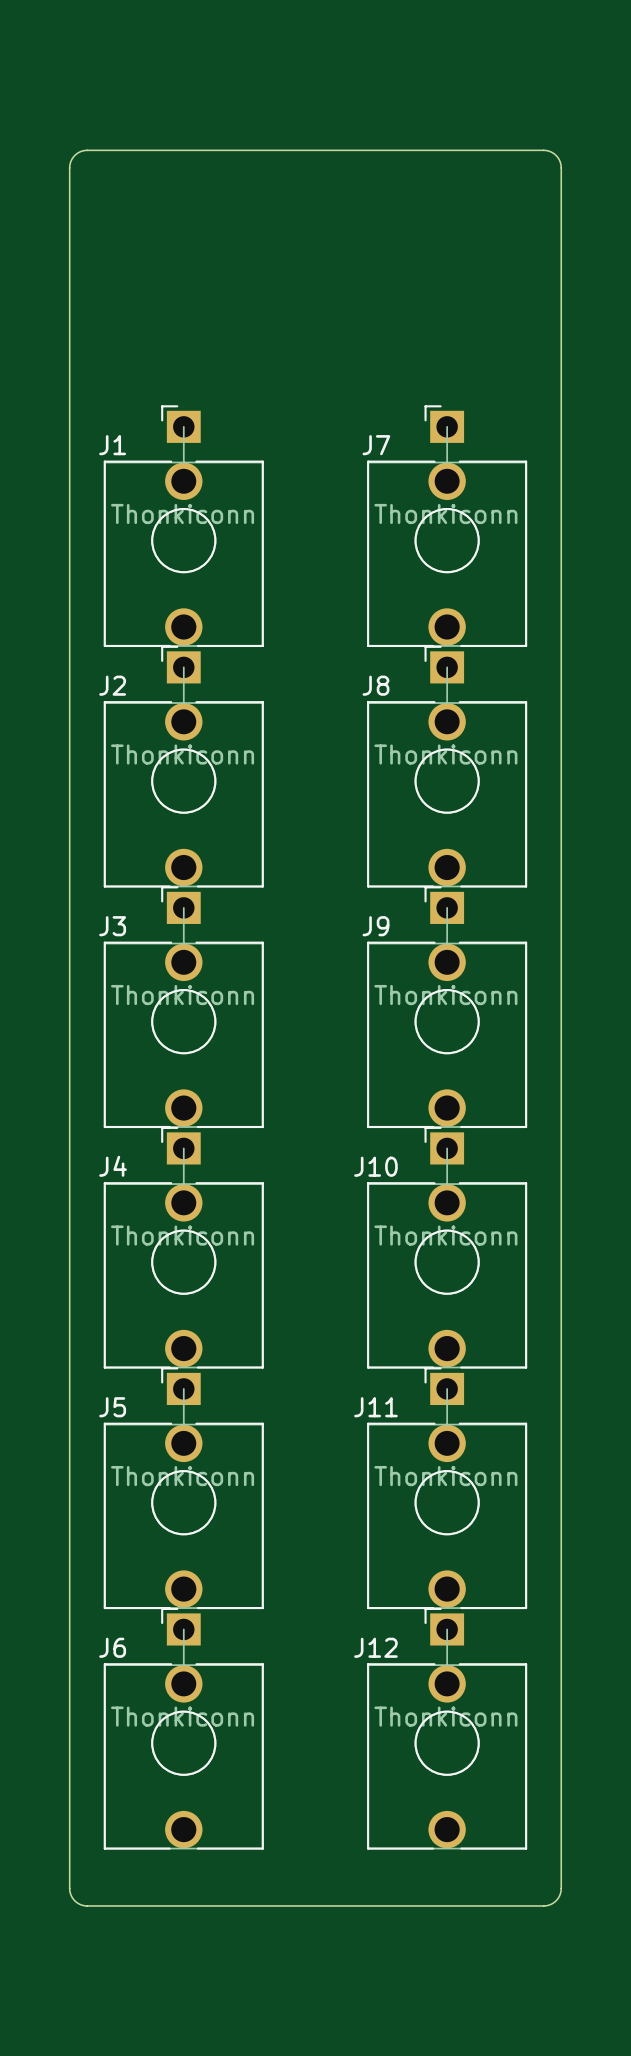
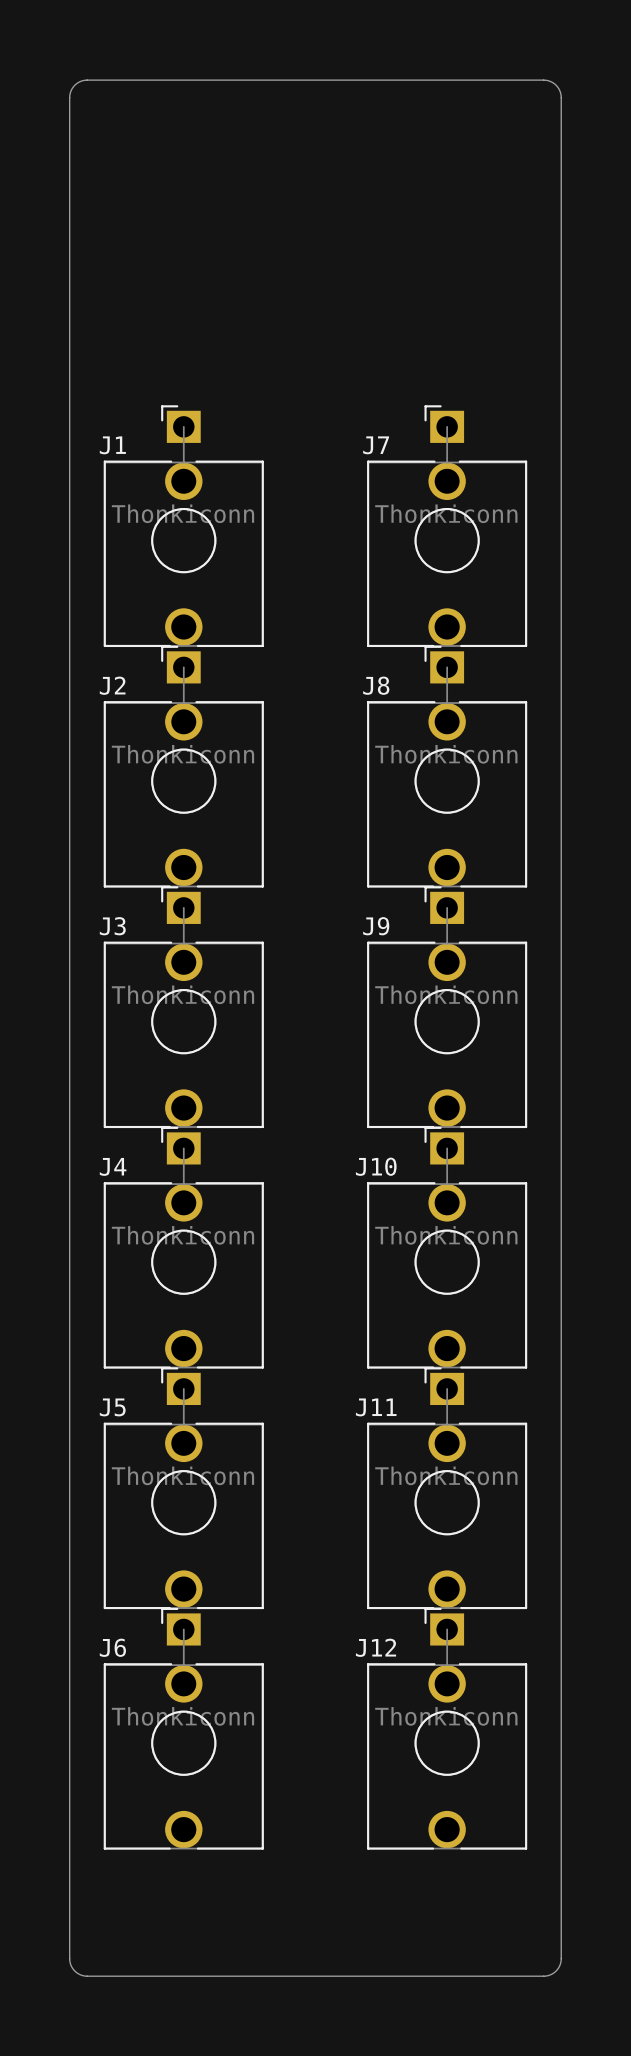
board edge: (69, 167) (74, 155) (87, 150) (543, 150) (556, 155) (561, 167) -> (69, 167) (70, 93) (76, 83) (87, 80) (547, 80) (557, 86) (561, 95) (561, 167)
board edge: (69, 1888) (74, 1900) (87, 1905) (543, 1905) (556, 1900) (561, 1888) -> (69, 1888) (70, 1962) (76, 1972) (87, 1976) (547, 1975) (557, 1969) (561, 1960) (561, 1888)

